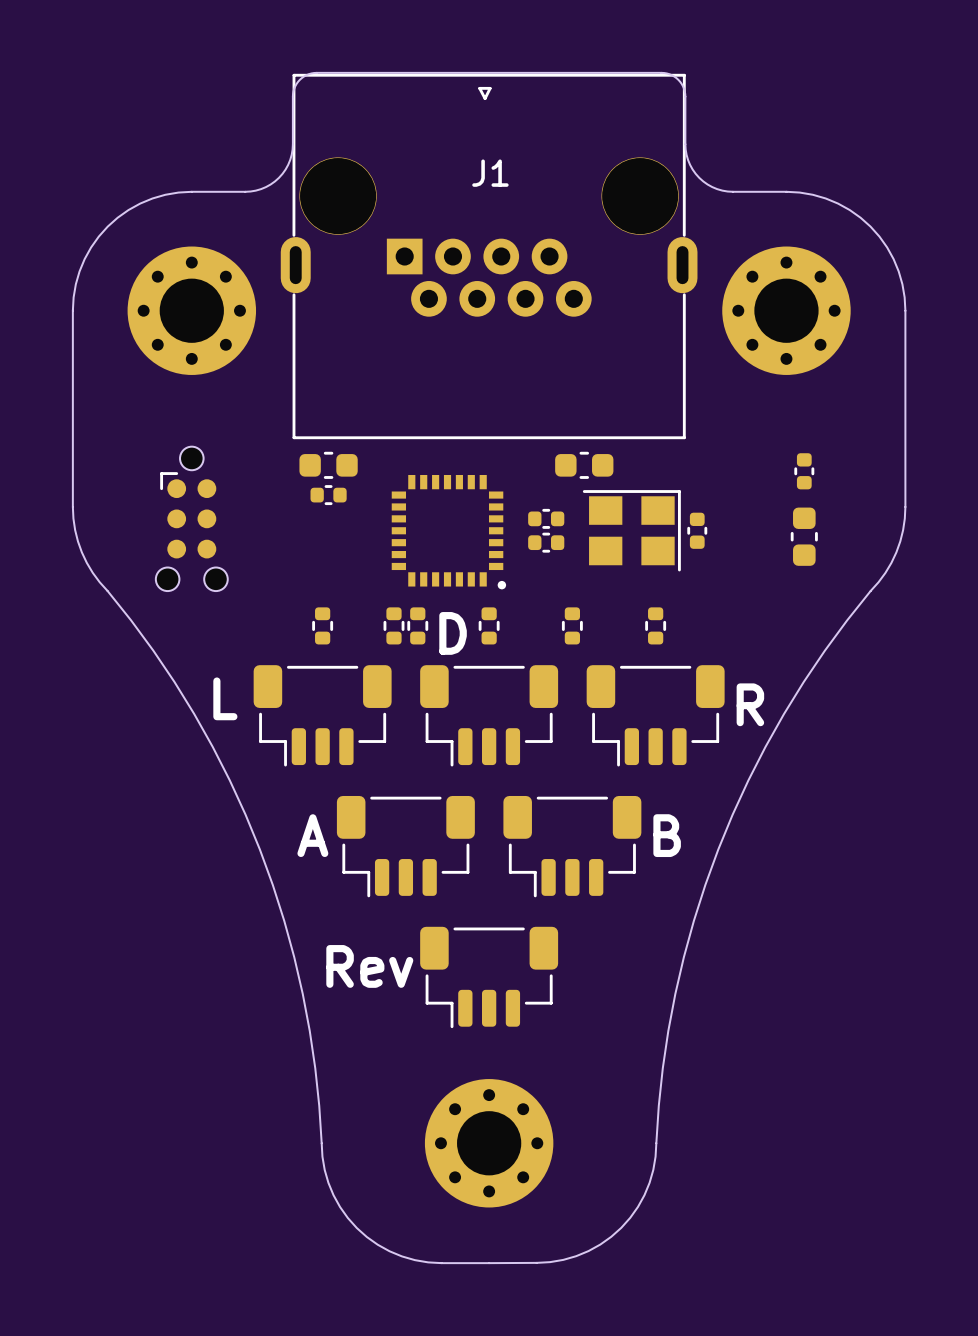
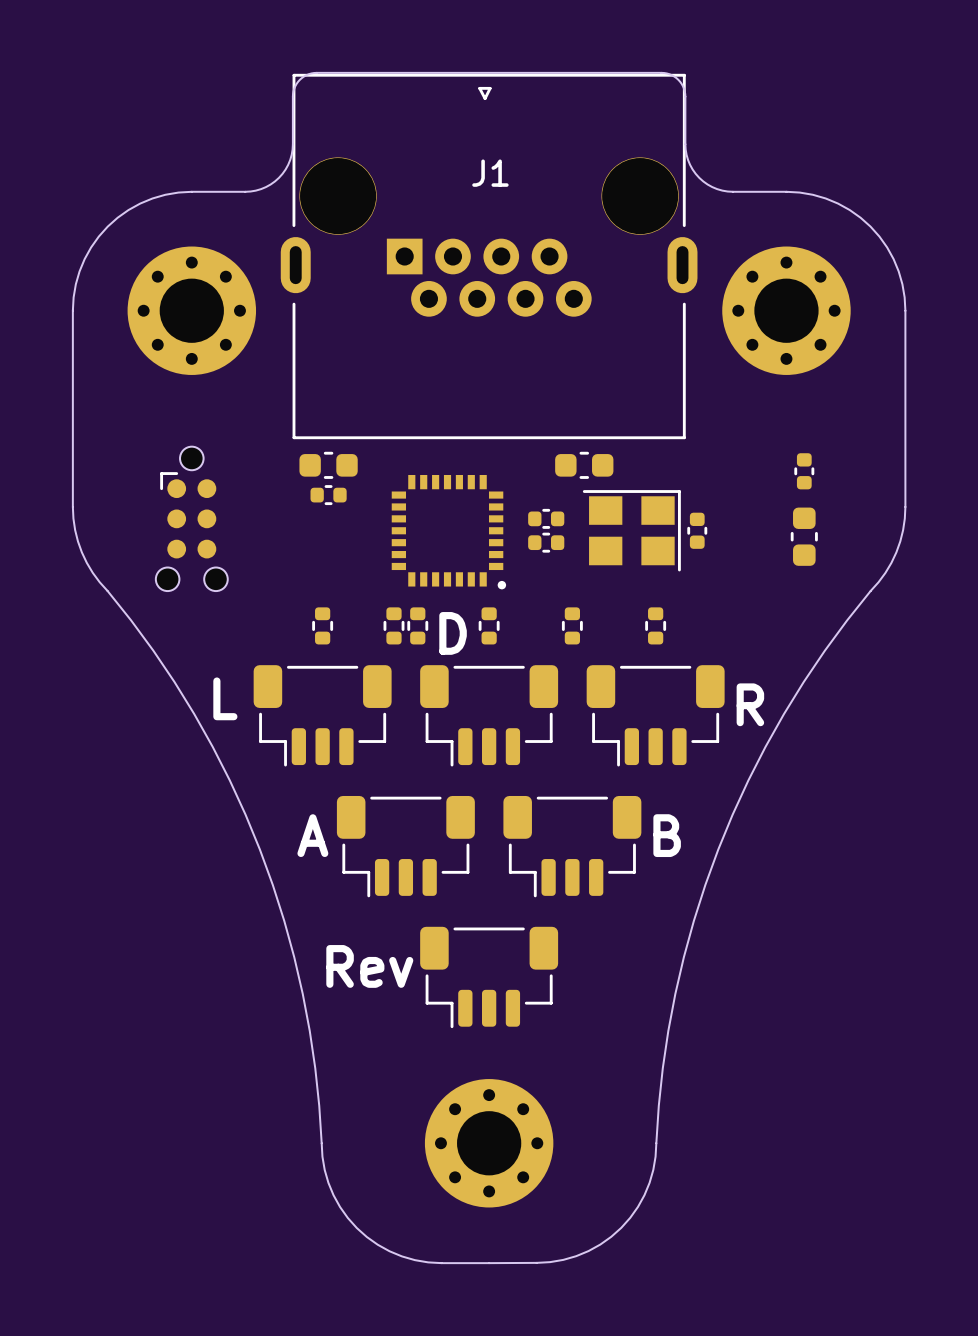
J1 footprint: [280, 73, 698, 440] -> [280, 73, 698, 440]

